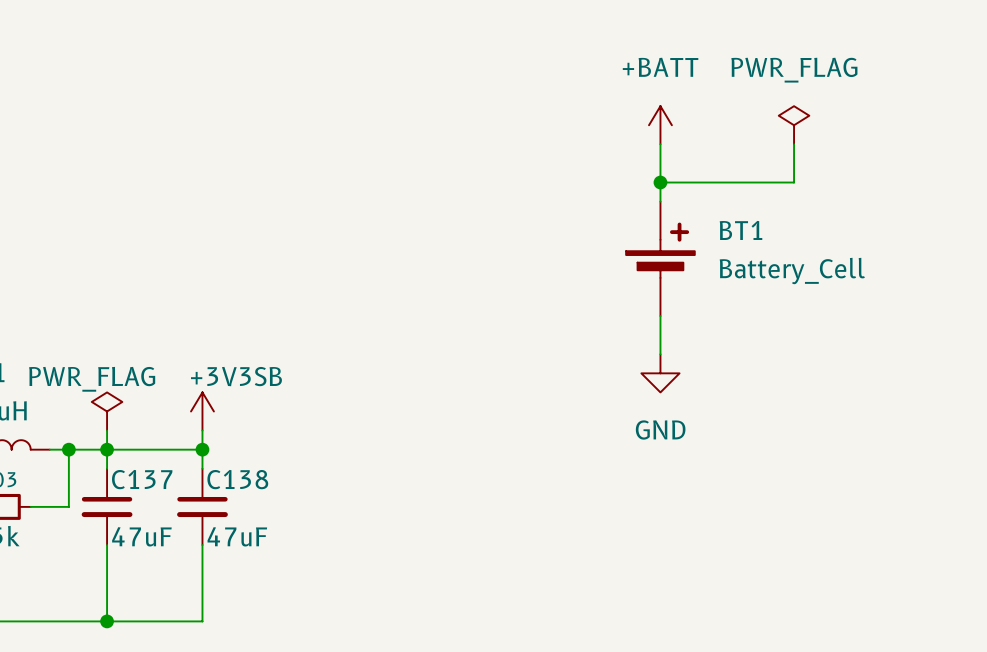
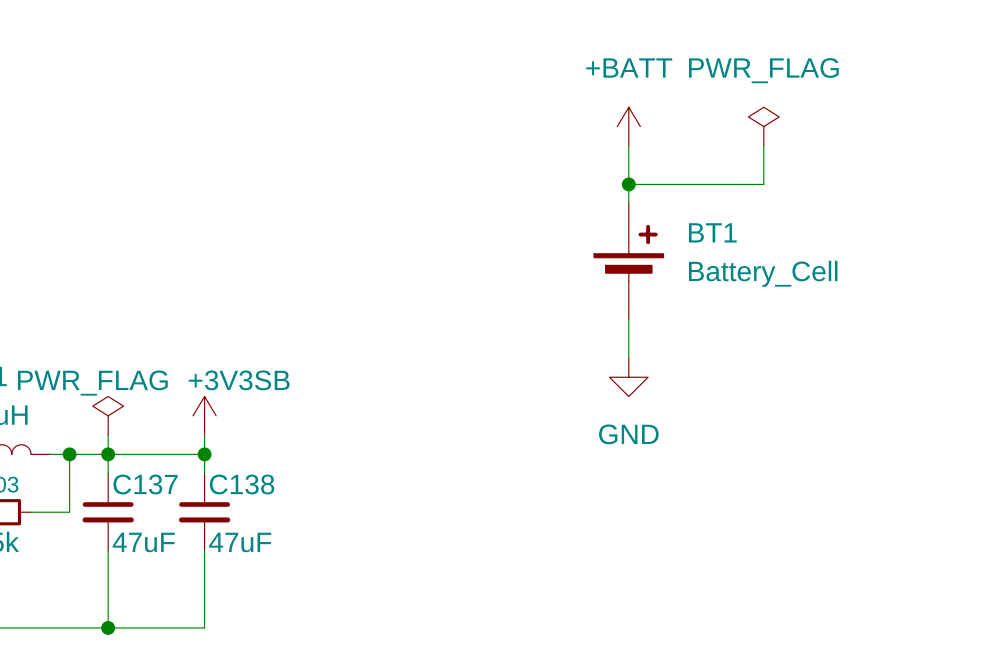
power symbol position: +BATT (660, 125) -> +BATT (628, 126)
power symbol position: PWR_FLAG (794, 125) -> PWR_FLAG (763, 126)
wire: (660, 144) (660, 201) -> (628, 145) (628, 203)
wire: (794, 144) (794, 182) (755, 182) -> (763, 145) (763, 184)
wire: none -> (628, 184) (667, 184)
junction position: (660, 182) -> (628, 184)
BT1 position: (660, 258) -> (628, 261)
wire: (660, 316) (660, 354) -> (628, 319) (628, 357)
power symbol position: GND (660, 373) -> GND (628, 377)

